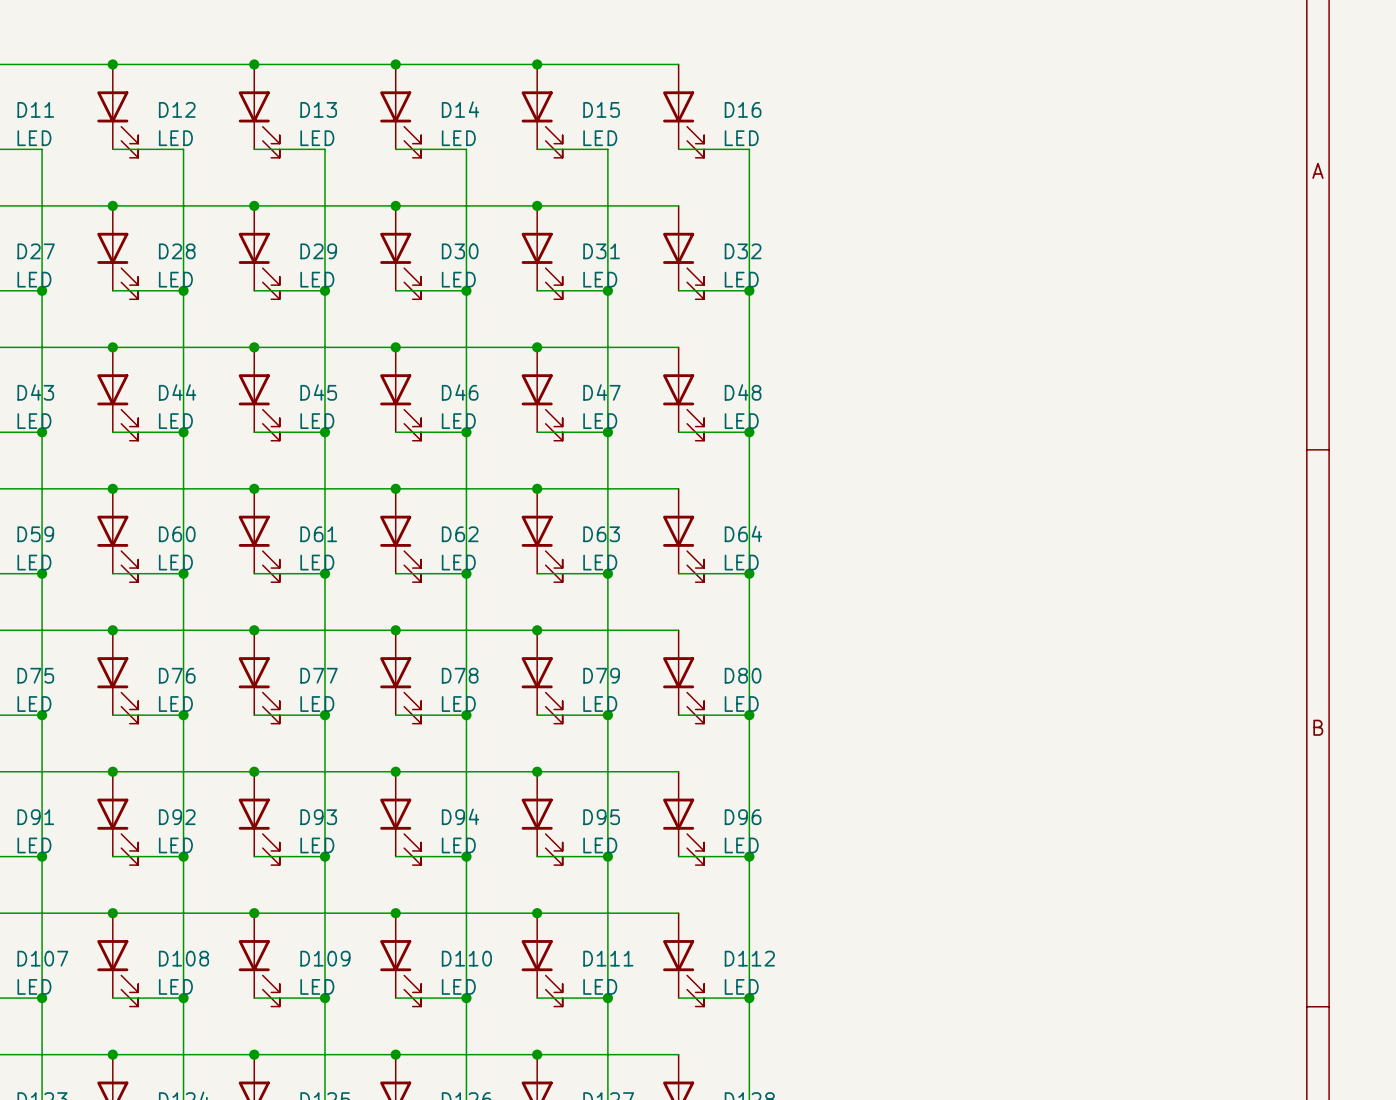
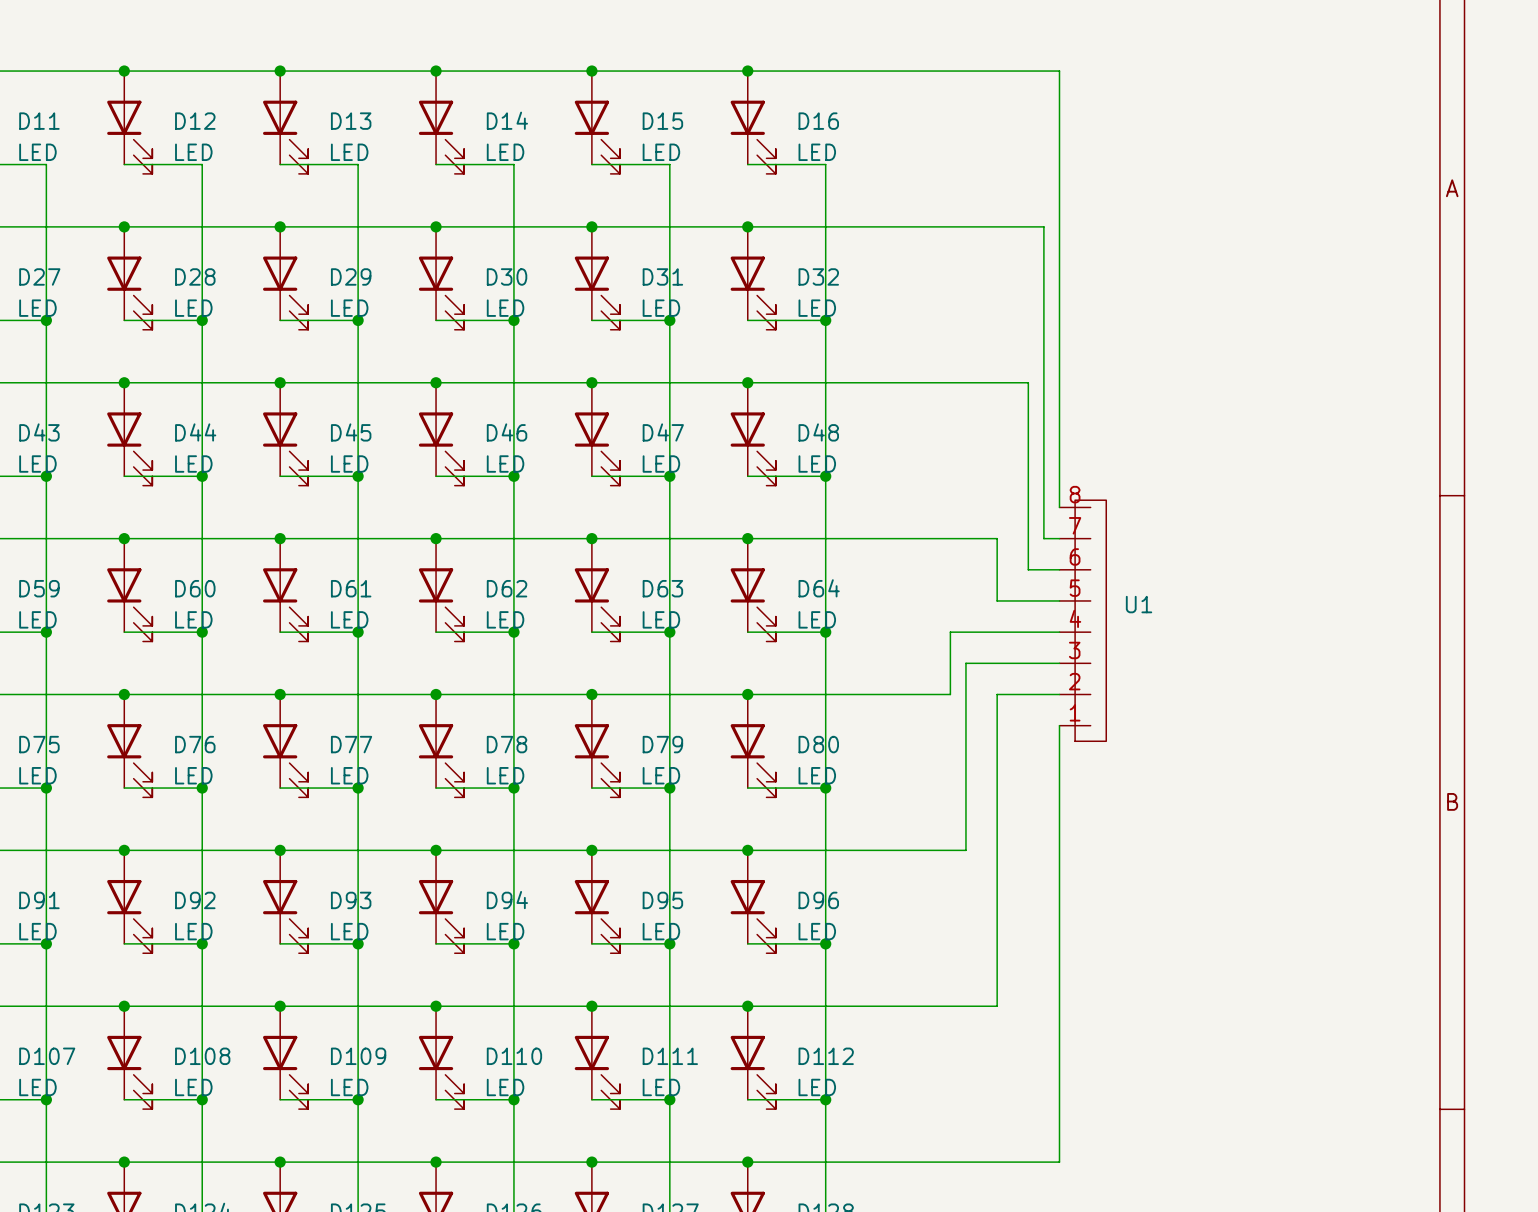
wire: none -> (747, 71) (1059, 71) (1059, 507)
junction: none -> (747, 71)
wire: none -> (747, 226) (1043, 226) (1043, 538) (1059, 538)
junction: none -> (747, 226)
wire: none -> (747, 382) (1028, 382) (1028, 569) (1059, 569)
junction: none -> (747, 382)
wire: none -> (747, 538) (997, 538) (997, 600) (1059, 600)
junction: none -> (747, 538)
U1: none -> (1082, 620)
wire: none -> (1059, 632) (950, 632) (950, 694) (747, 694)
wire: none -> (1059, 663) (965, 663) (965, 850) (747, 850)
junction: none -> (747, 694)
wire: none -> (1059, 694) (997, 694) (997, 1006) (747, 1006)
wire: none -> (1059, 725) (1059, 1162) (747, 1162)
junction: none -> (747, 850)
junction: none -> (747, 1006)
junction: none -> (747, 1162)

